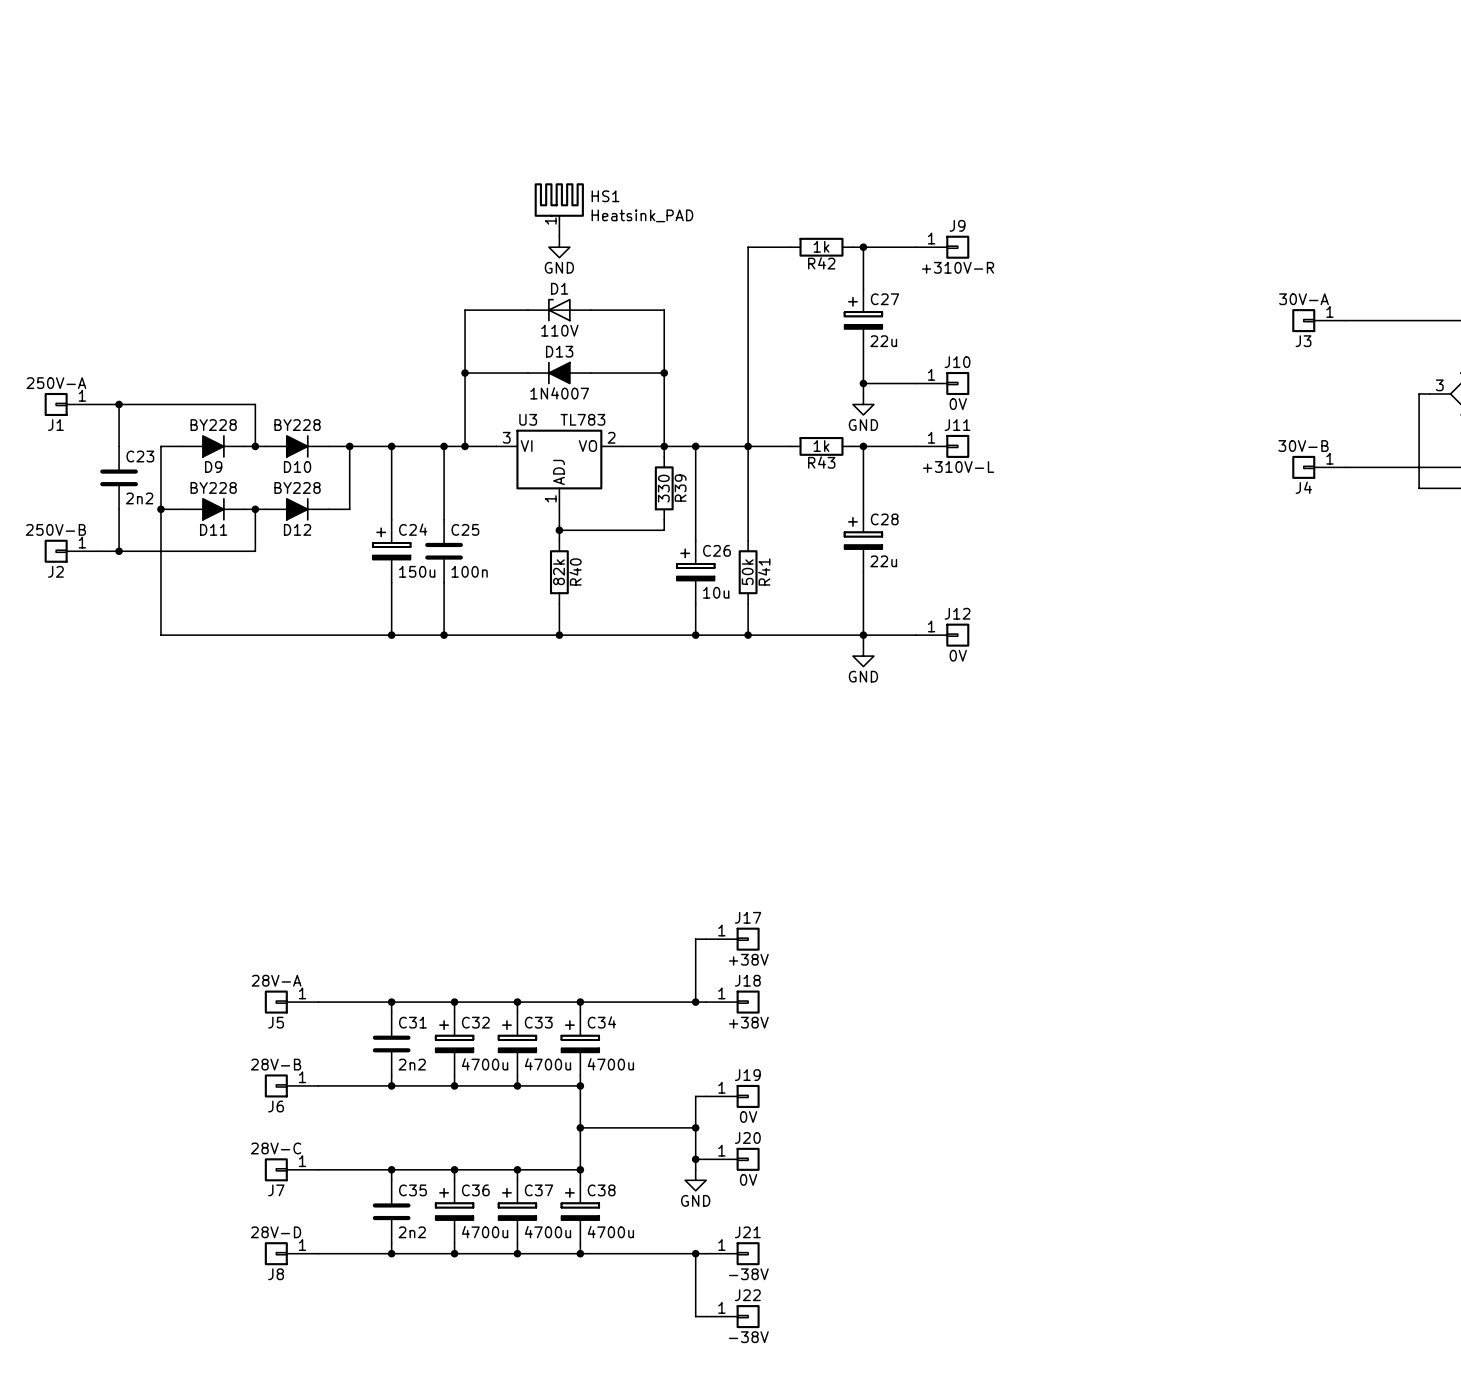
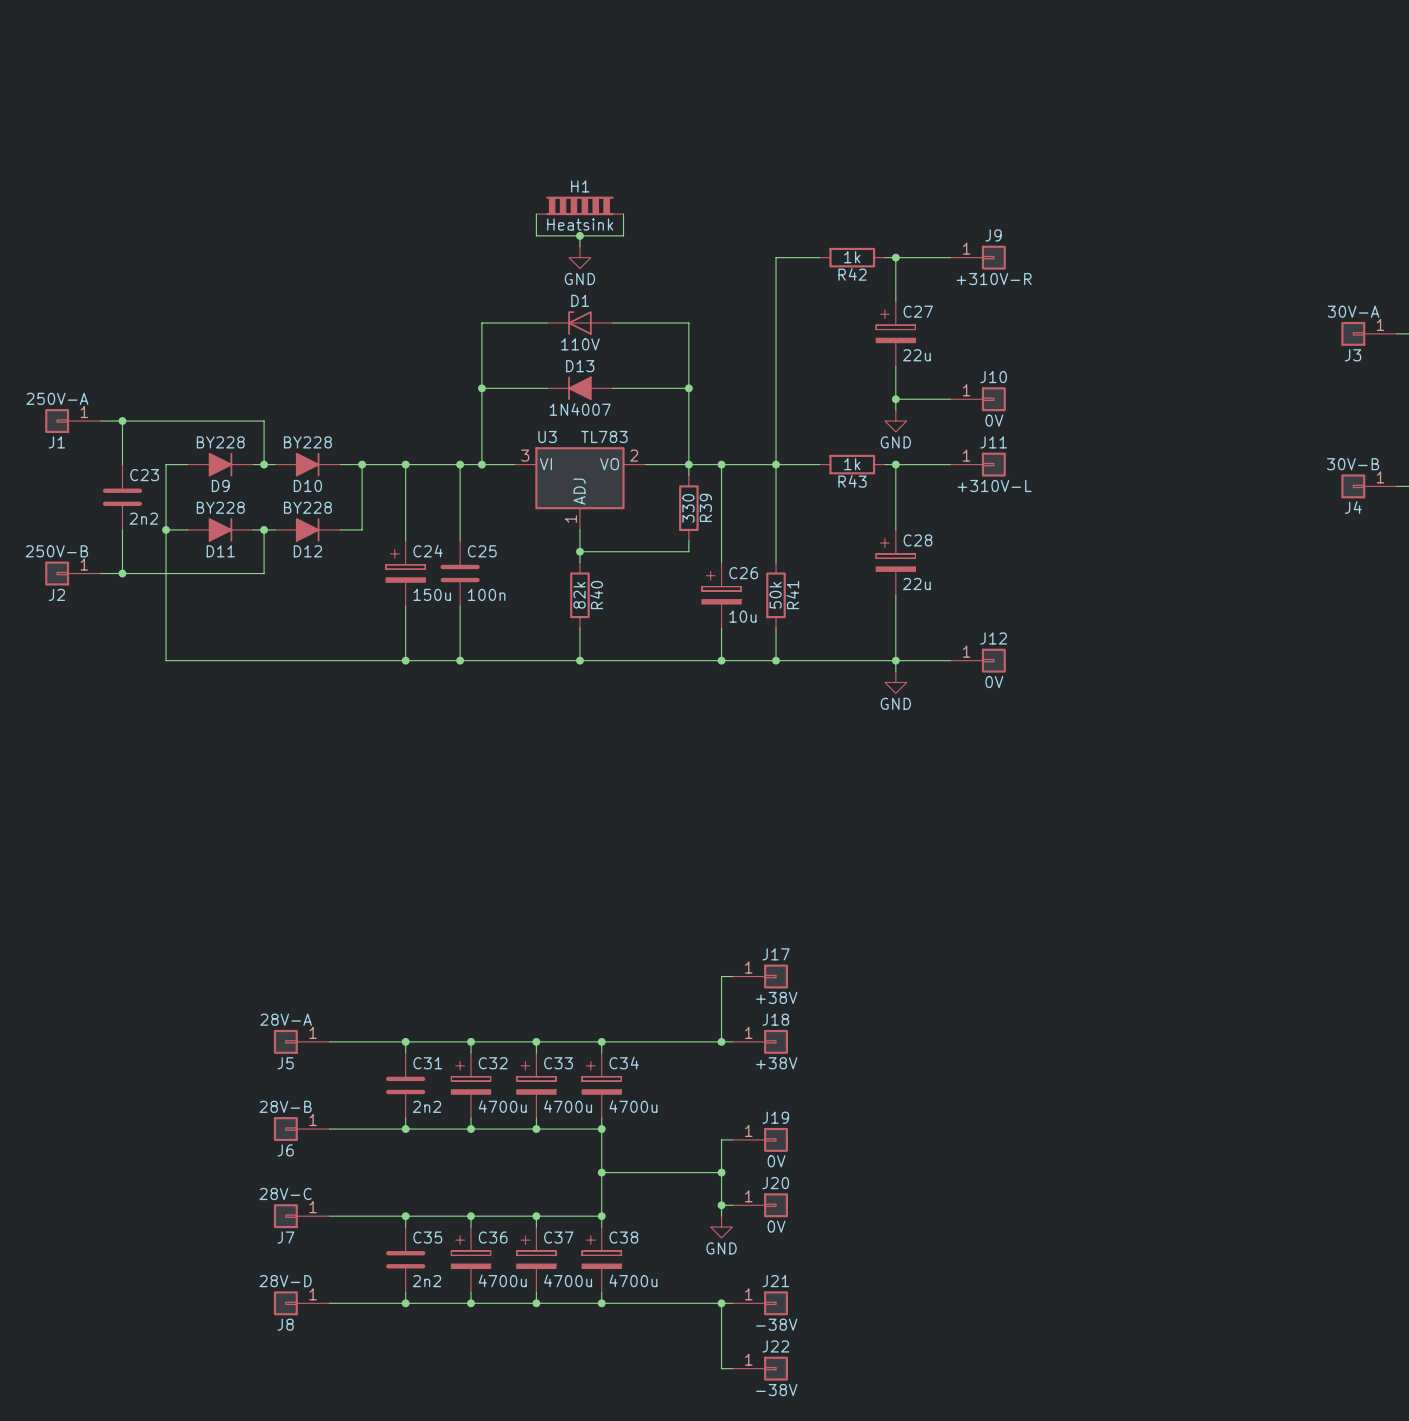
H1: none -> Heatsink (579, 205)
HS1: Heatsink_PAD (559, 204) -> none
wire: none -> (536, 214) (536, 235) (623, 235) (623, 214)
junction: none -> (579, 235)

